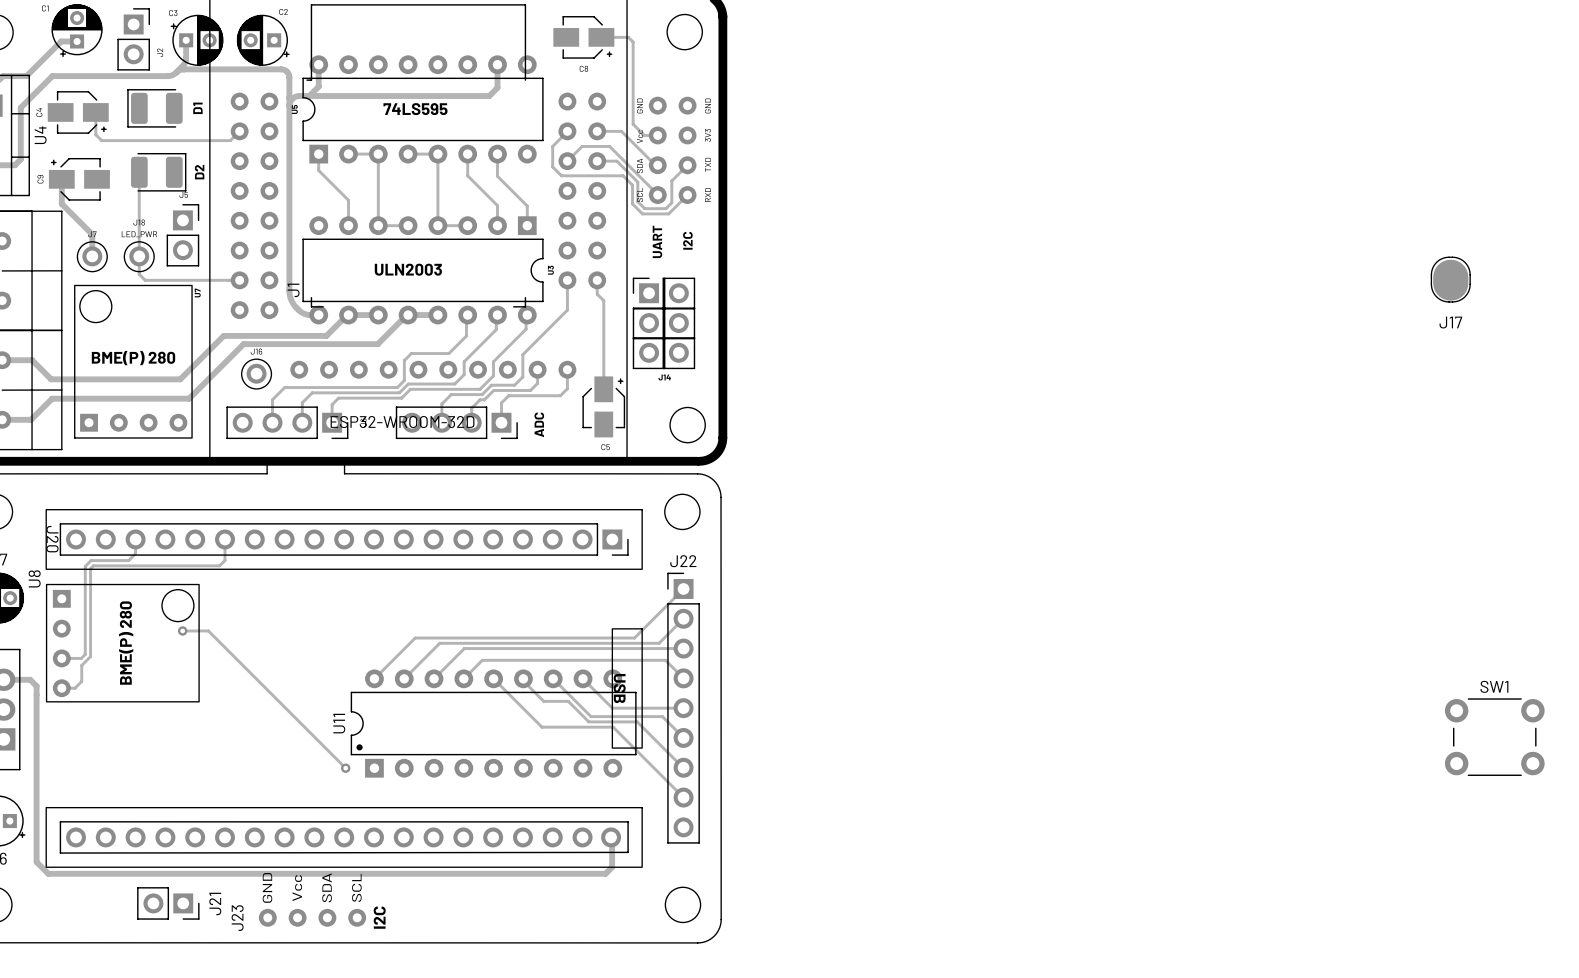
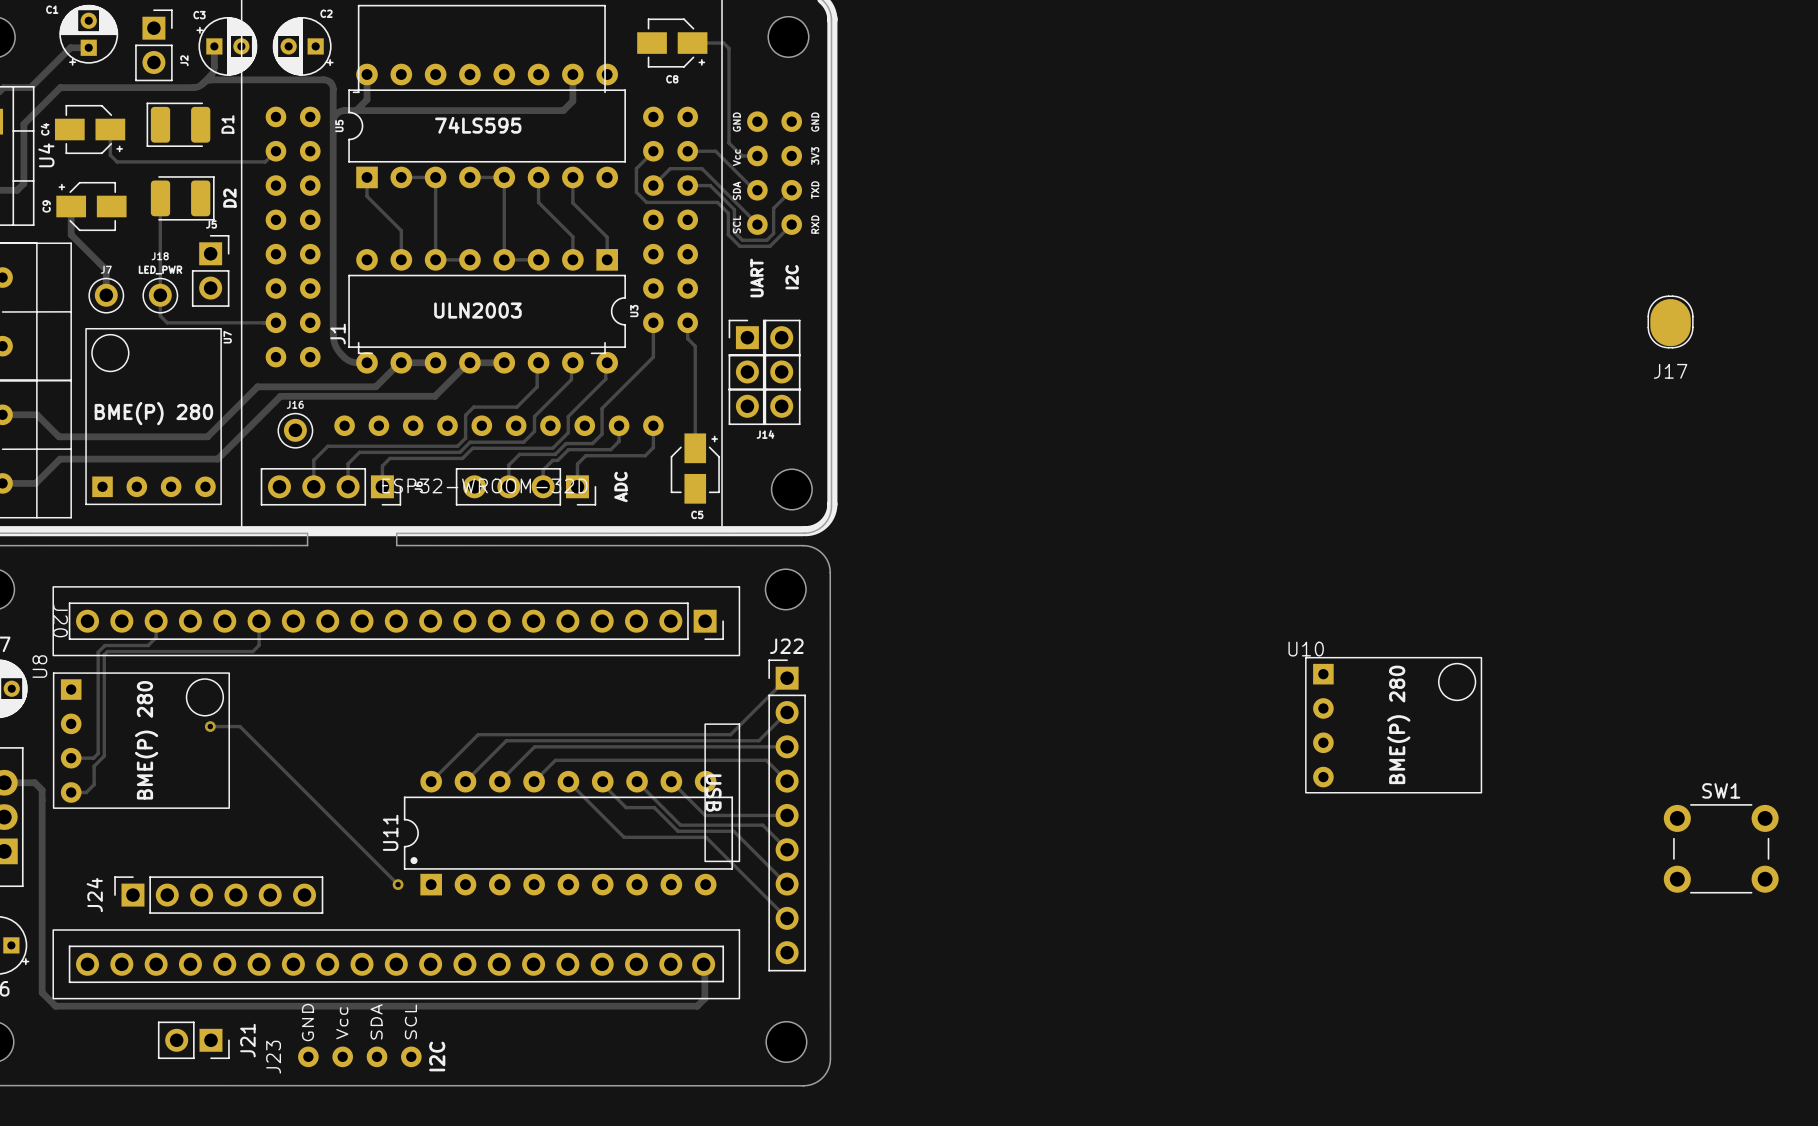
U10: none -> (1393, 725)
J24: none -> (218, 895)

